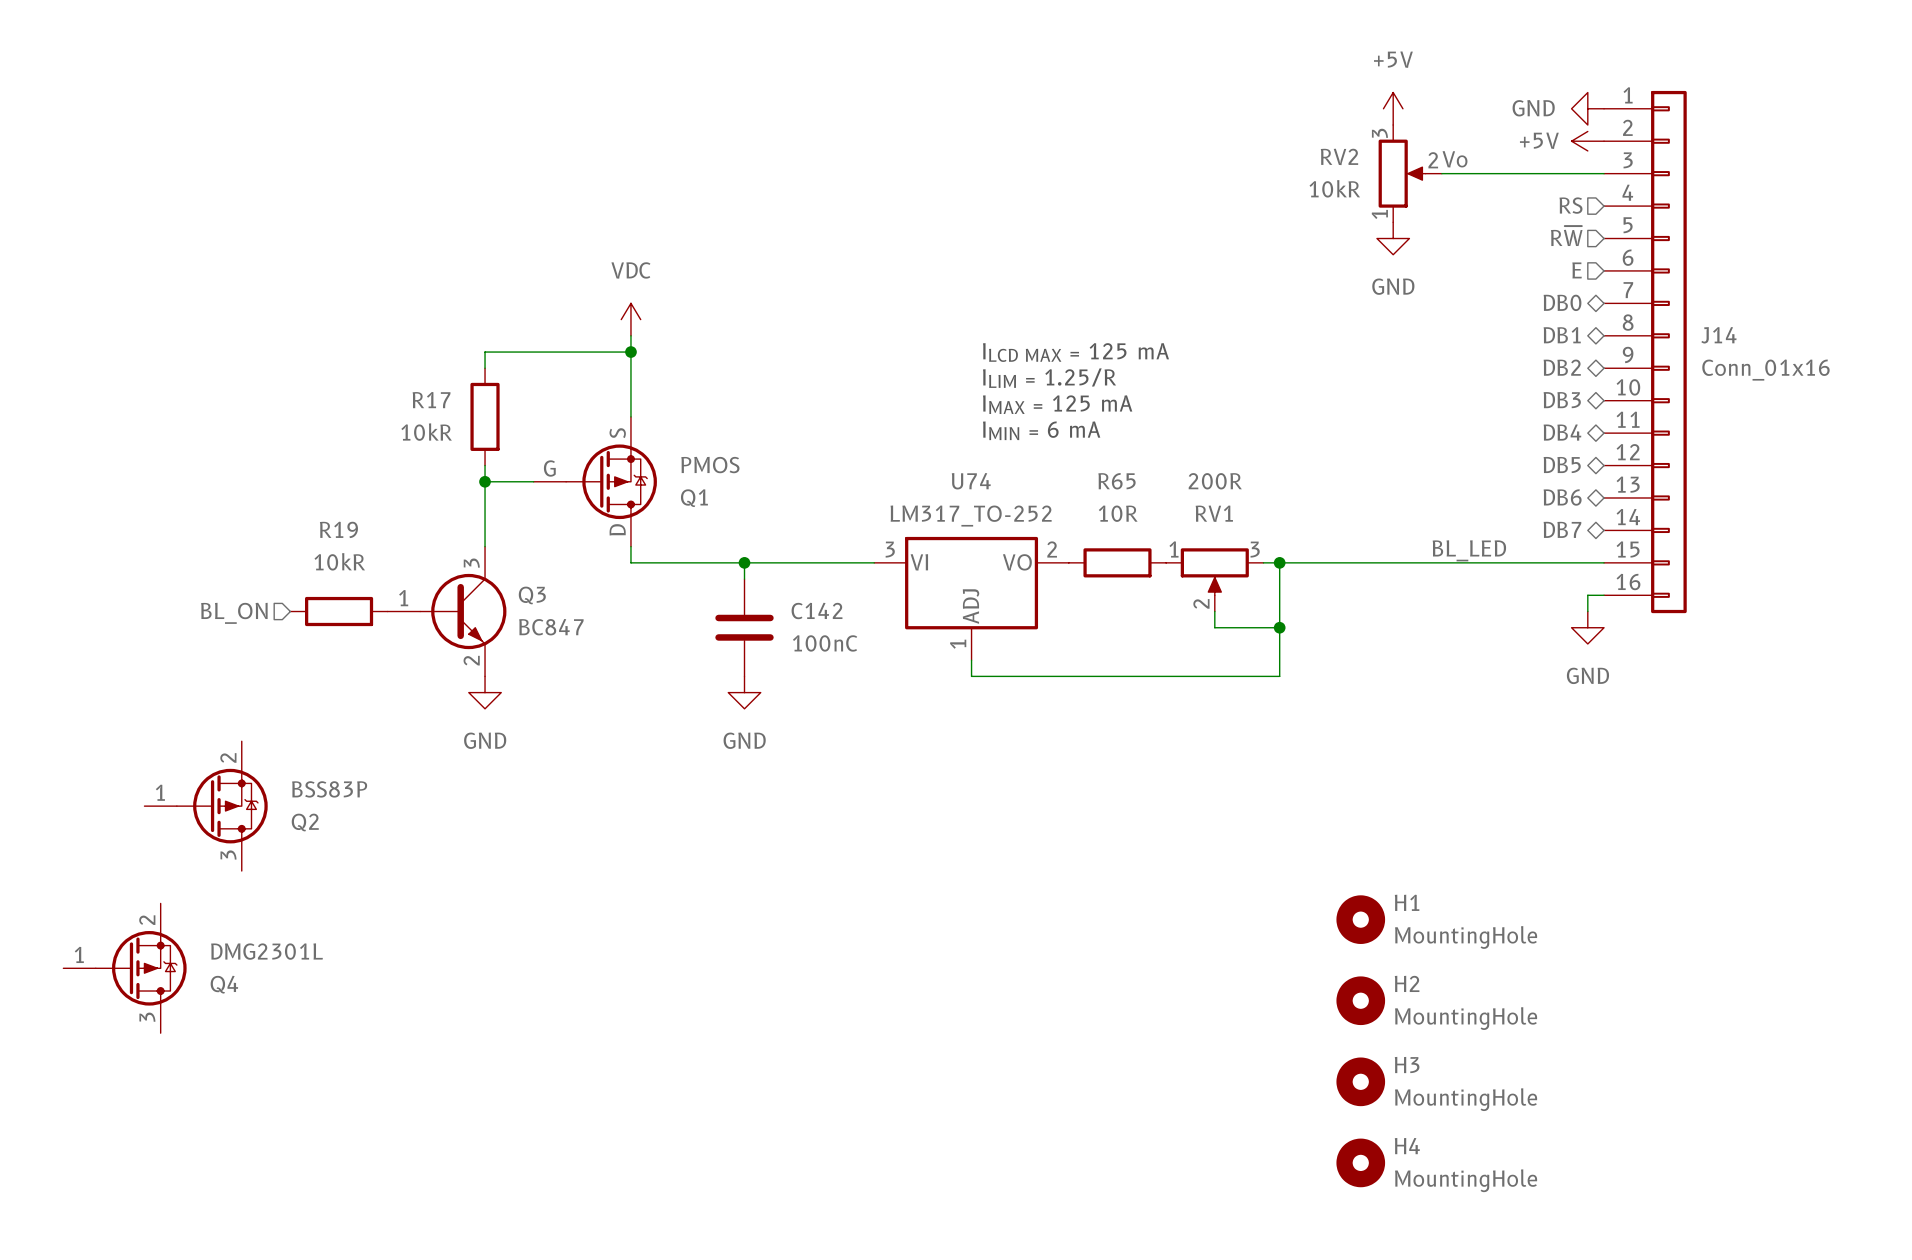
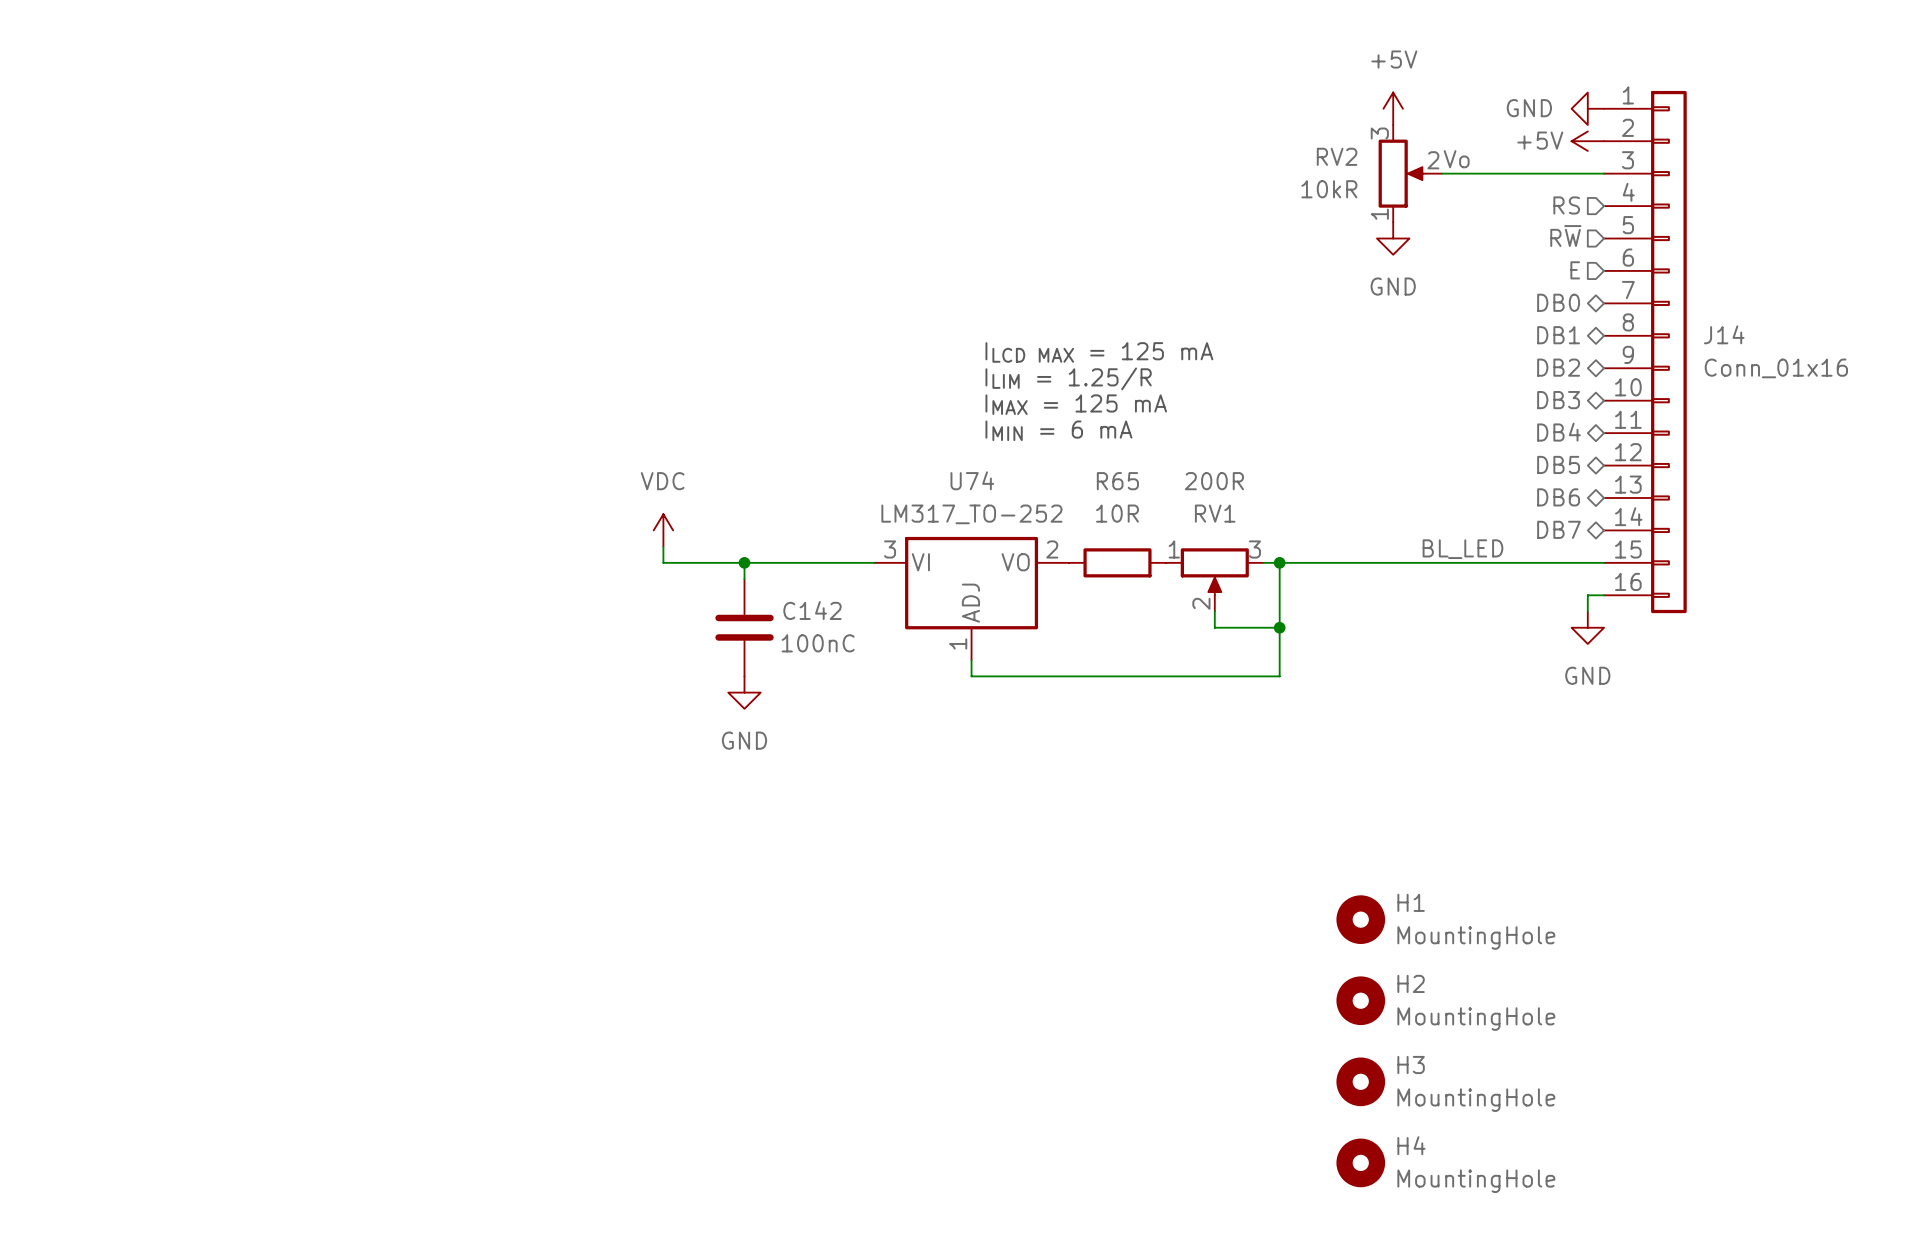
power symbol position: VDC (630, 319) -> VDC (663, 530)
wire: (630, 335) (630, 416) -> none
wire: (630, 352) (485, 352) (485, 368) -> none
junction: (630, 352) -> none
R17: 10kR (485, 416) -> none
wire: (485, 465) (485, 546) -> none
wire: (485, 481) (533, 481) -> none
junction: (485, 481) -> none
Q1: PMOS (595, 481) -> none
wire: (630, 546) (630, 562) (663, 562) -> (663, 546) (663, 562)
R19: 10kR (339, 611) -> none
Q3: BC847 (447, 611) -> none
hierarchical label: BL_ON (234, 613) -> none
power symbol: GND (485, 692) -> none
Q2: BSS83P (206, 806) -> none
Q4: DMG2301L (124, 968) -> none

